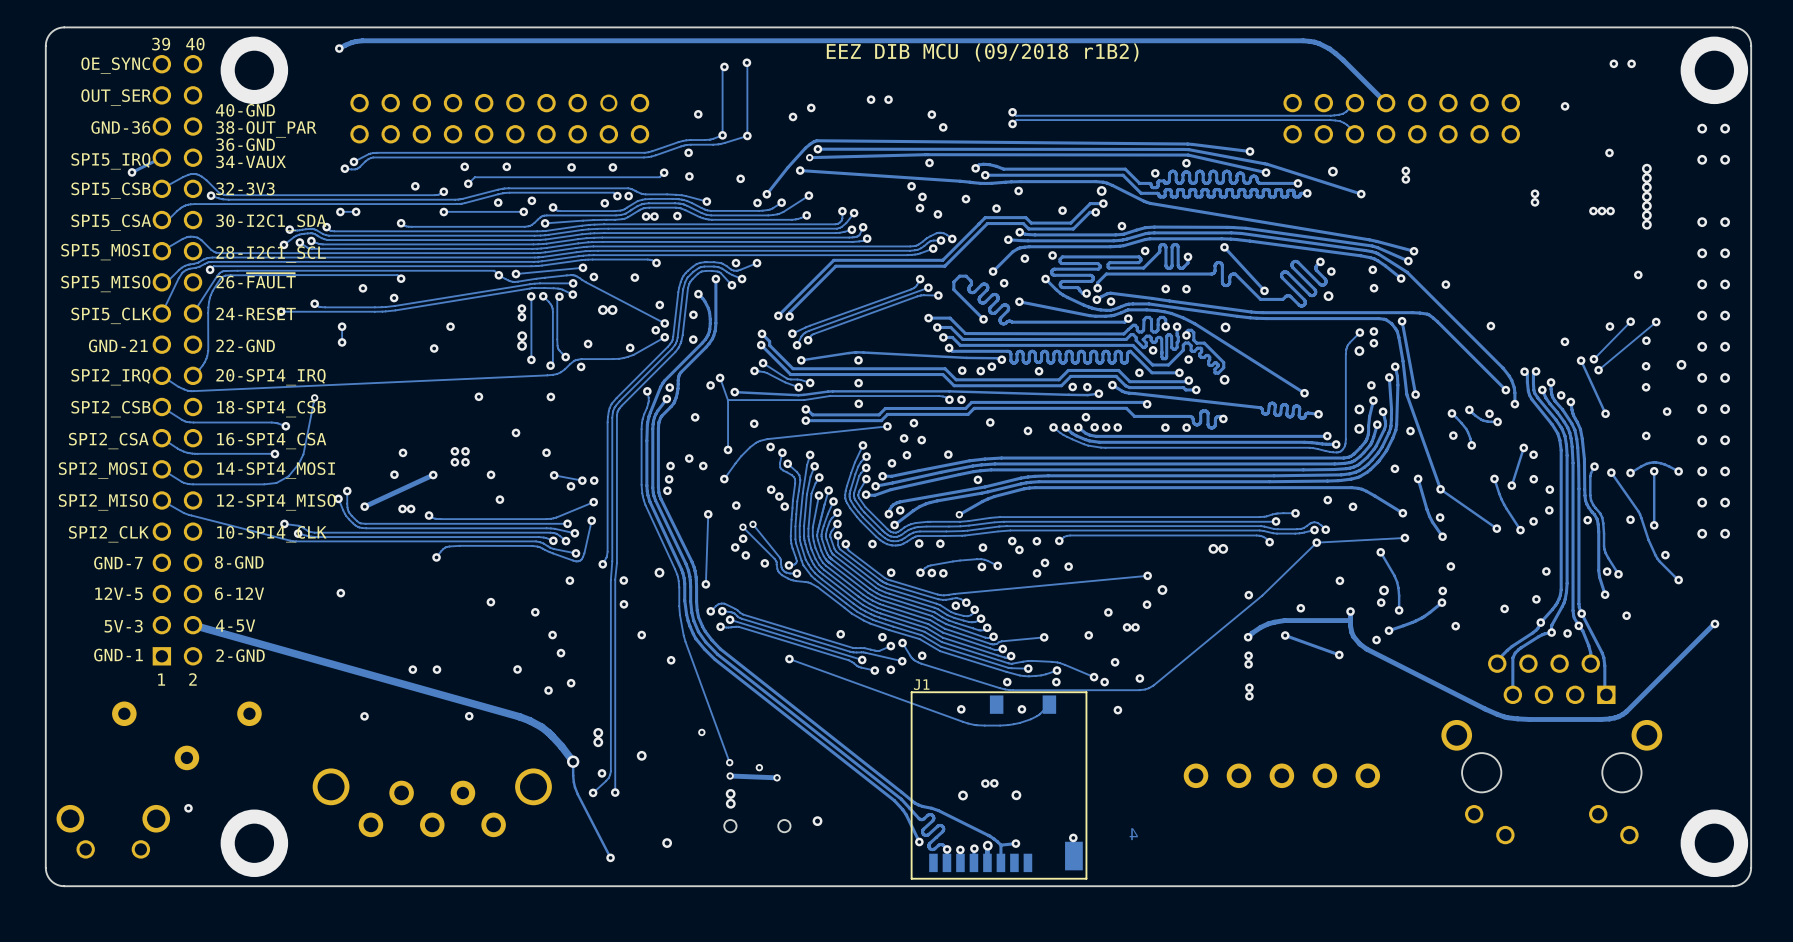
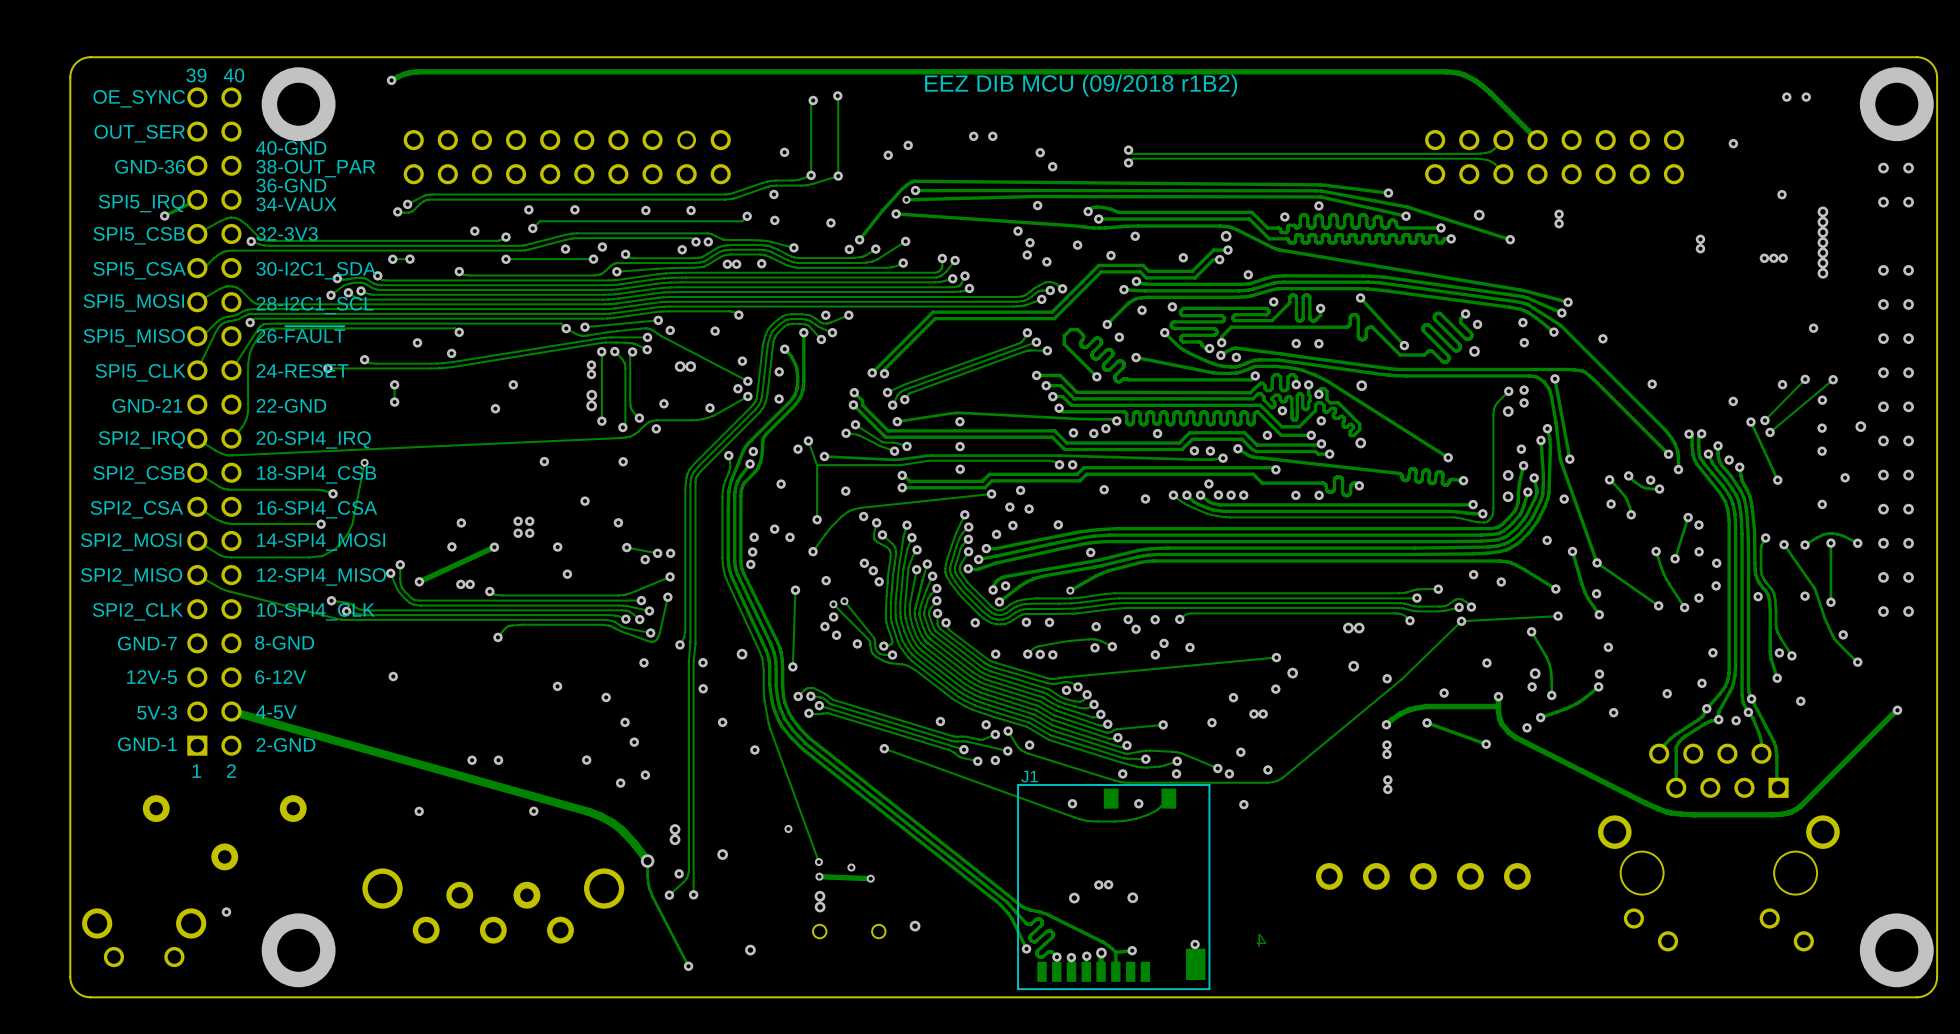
via: none -> (1353, 666)

